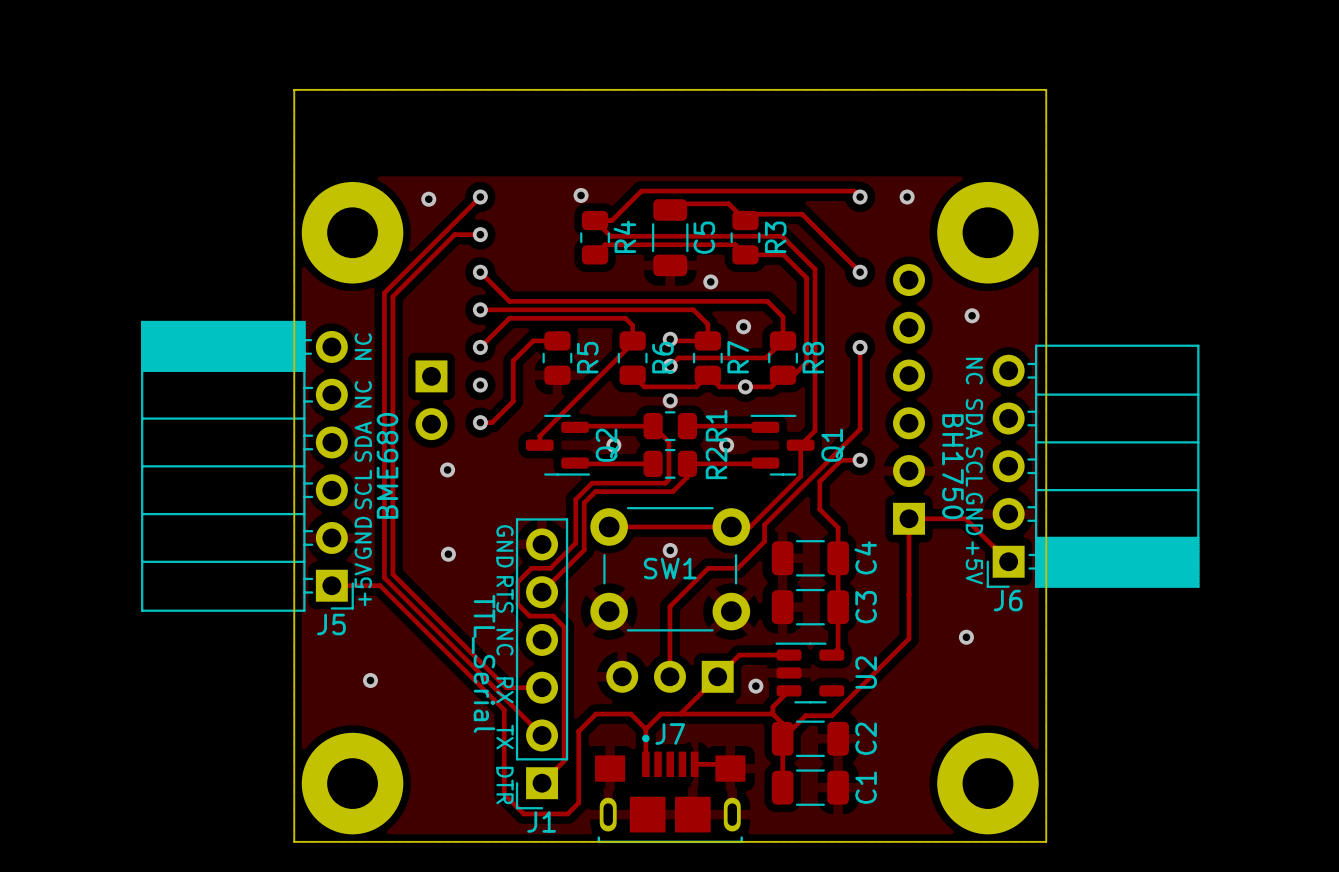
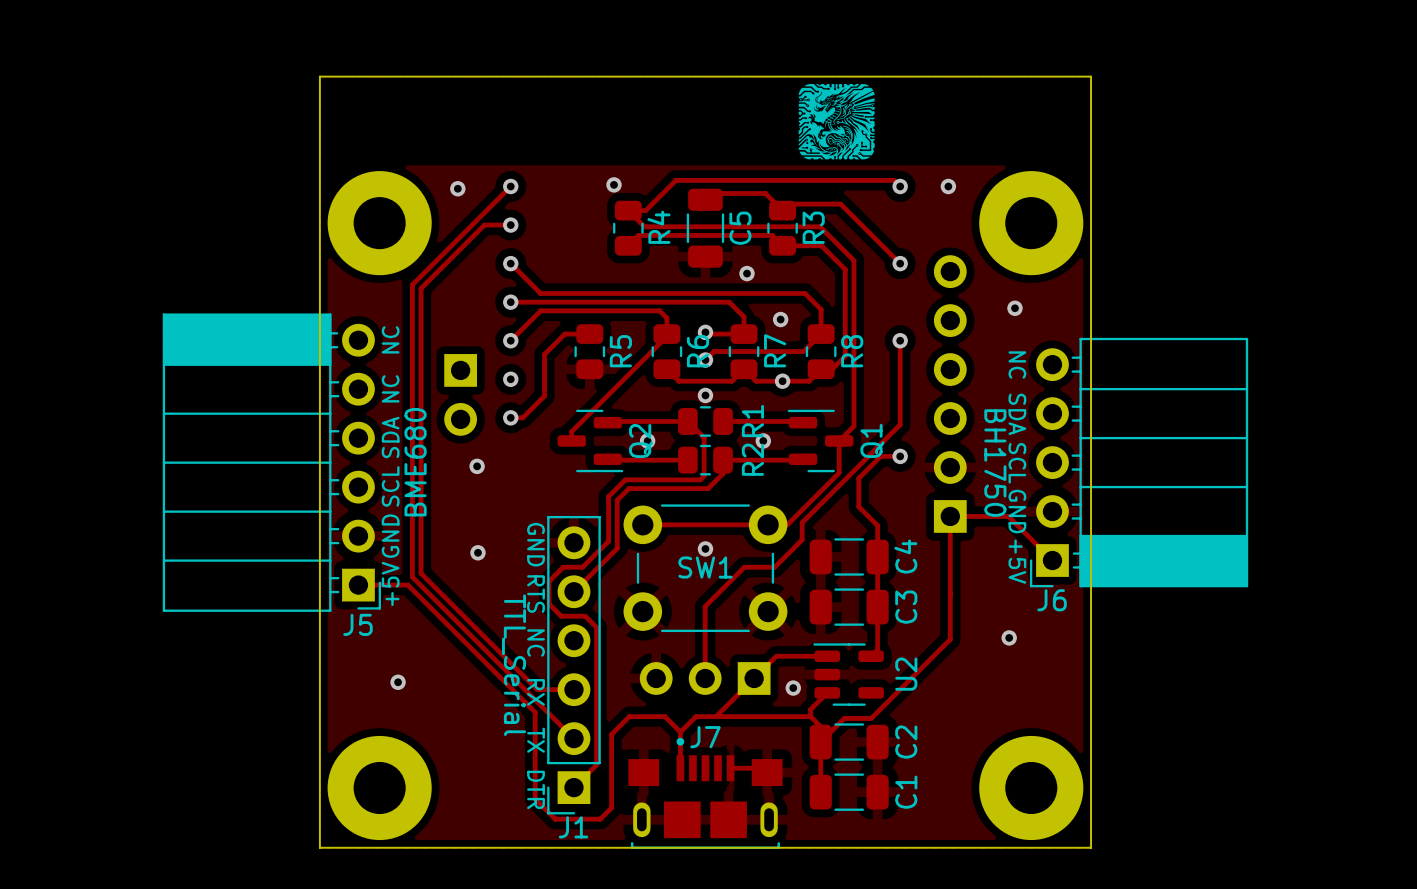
drawing: none -> [798, 83, 875, 160]

